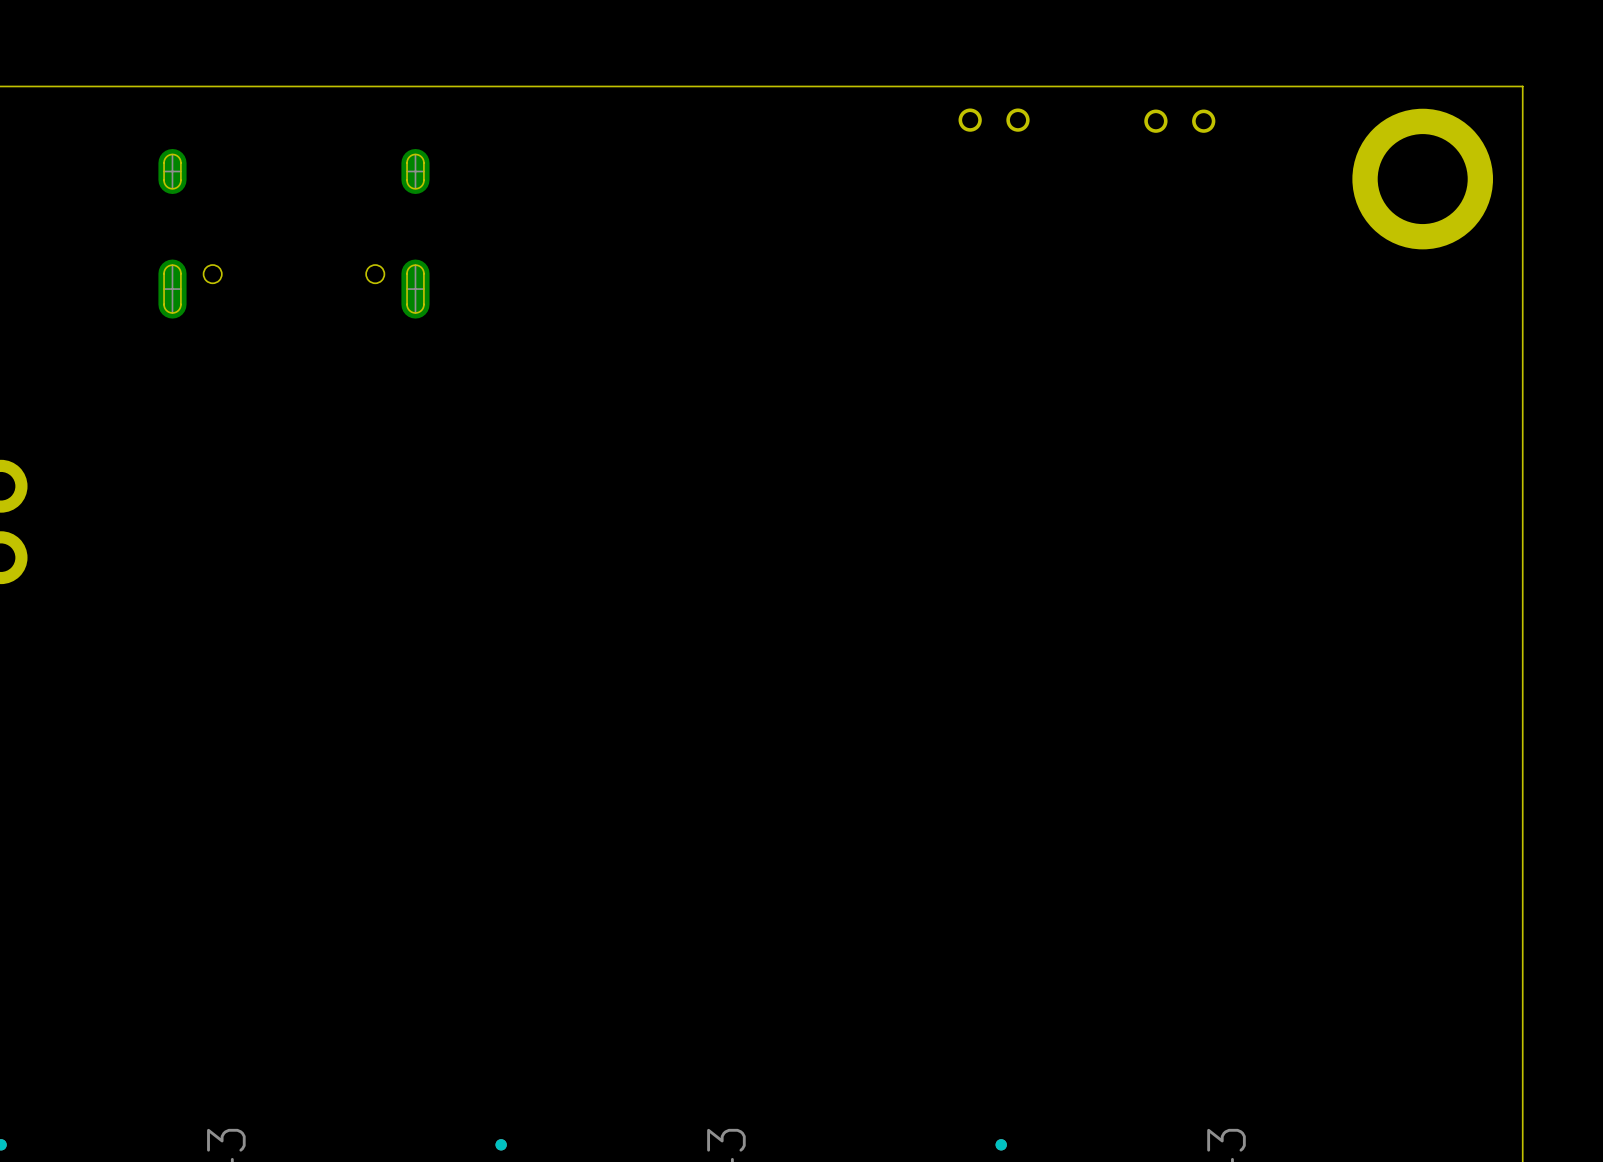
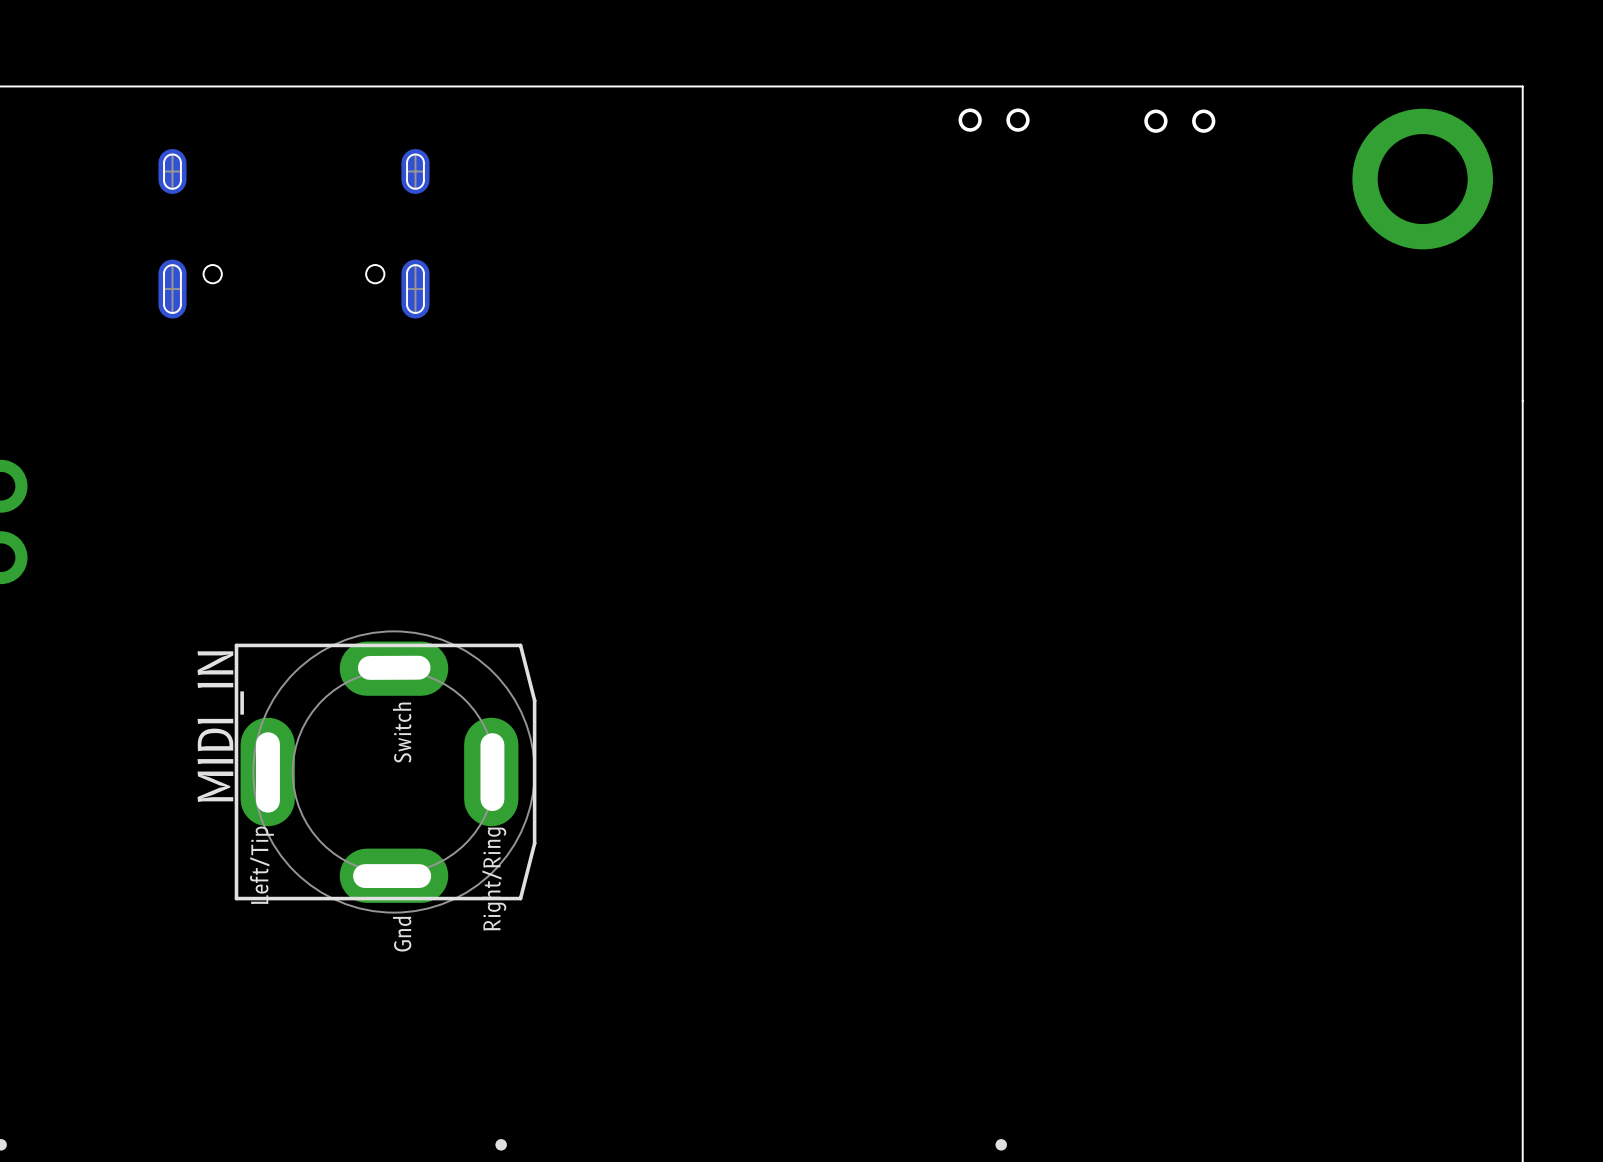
MIDI_IN: none -> (385, 771)

